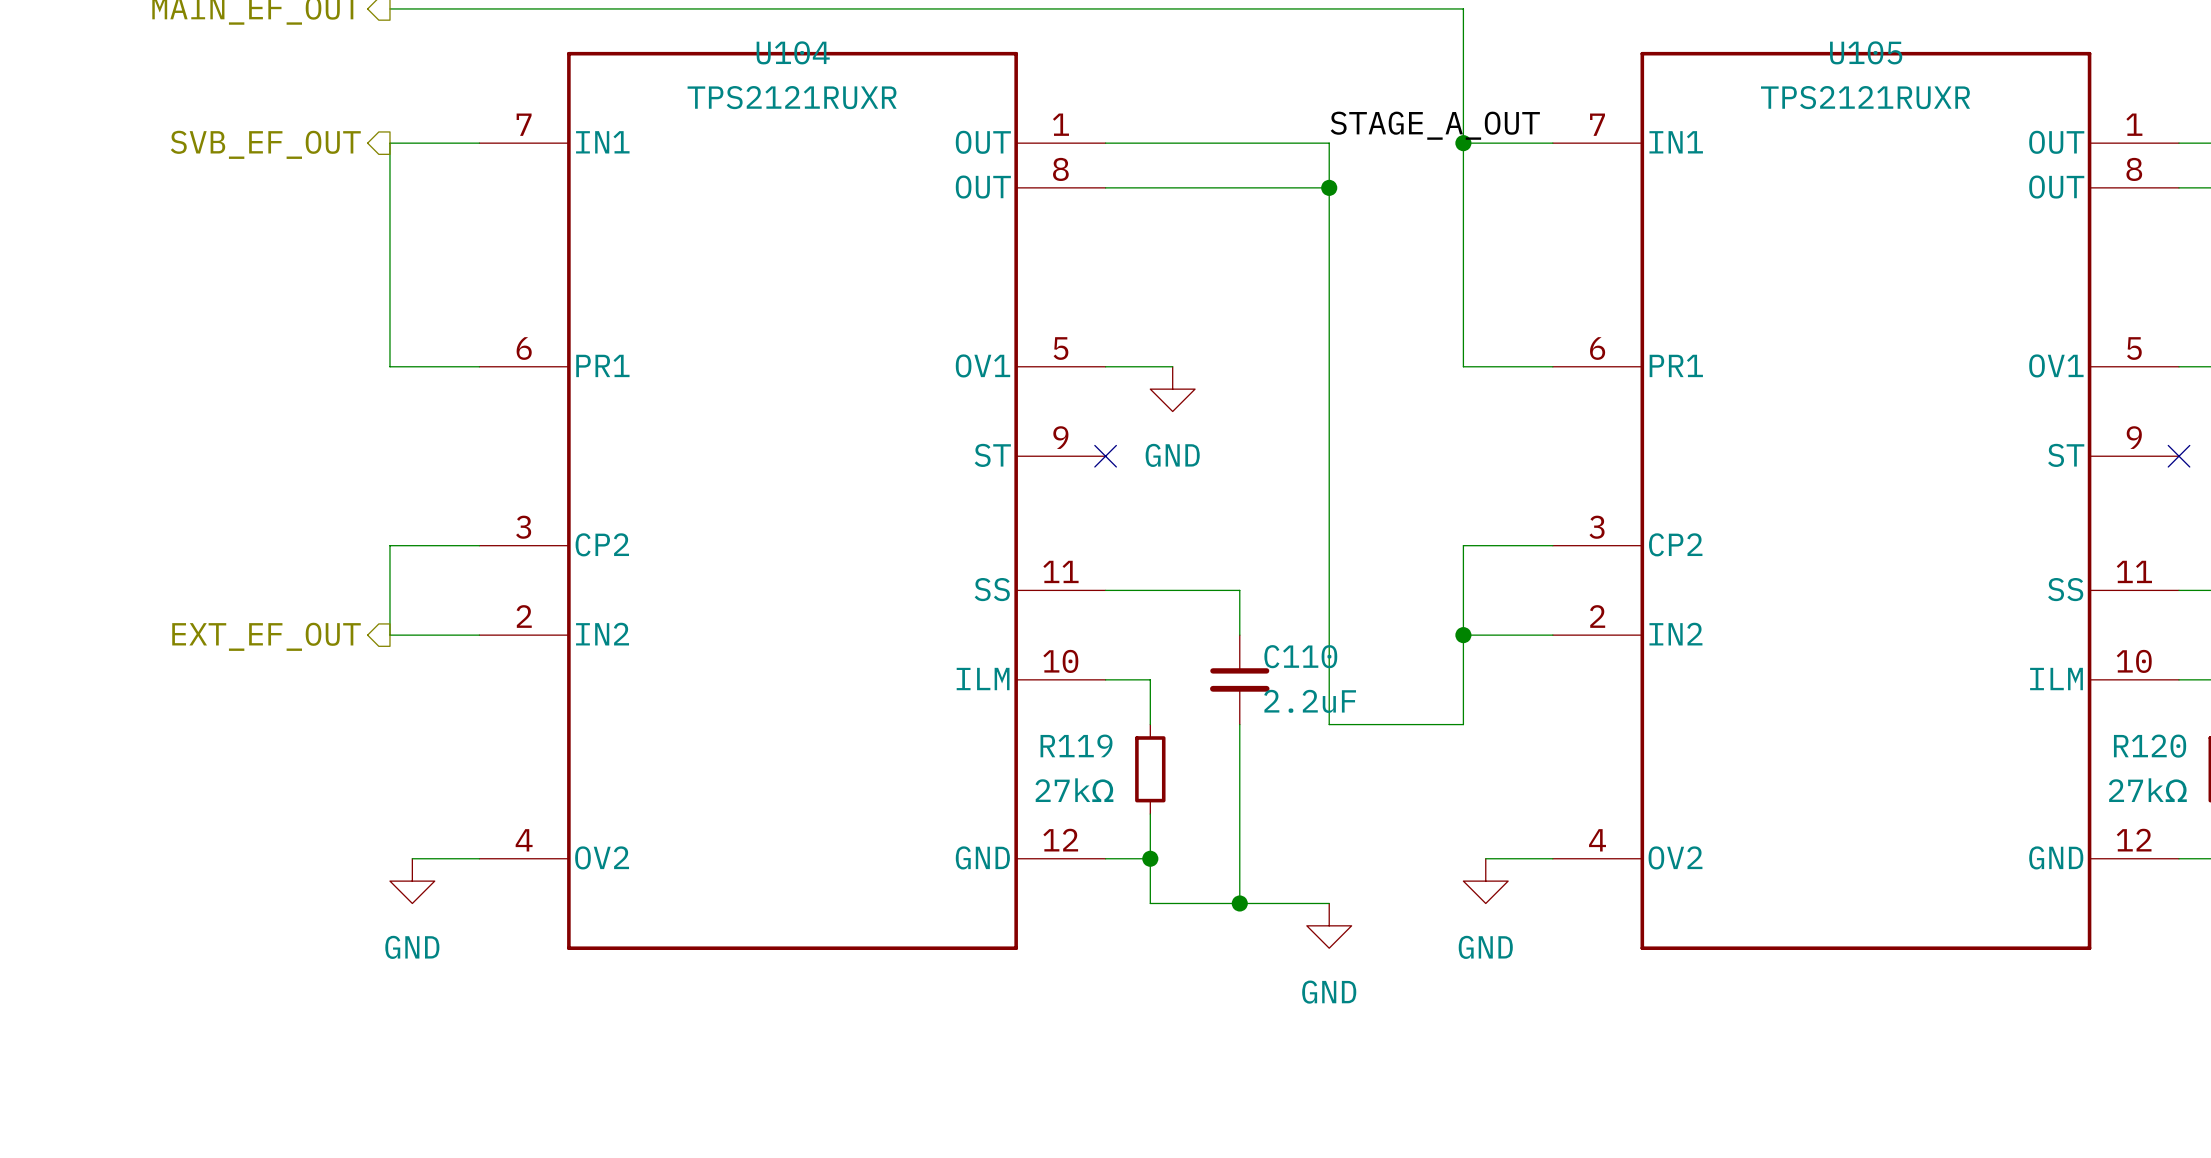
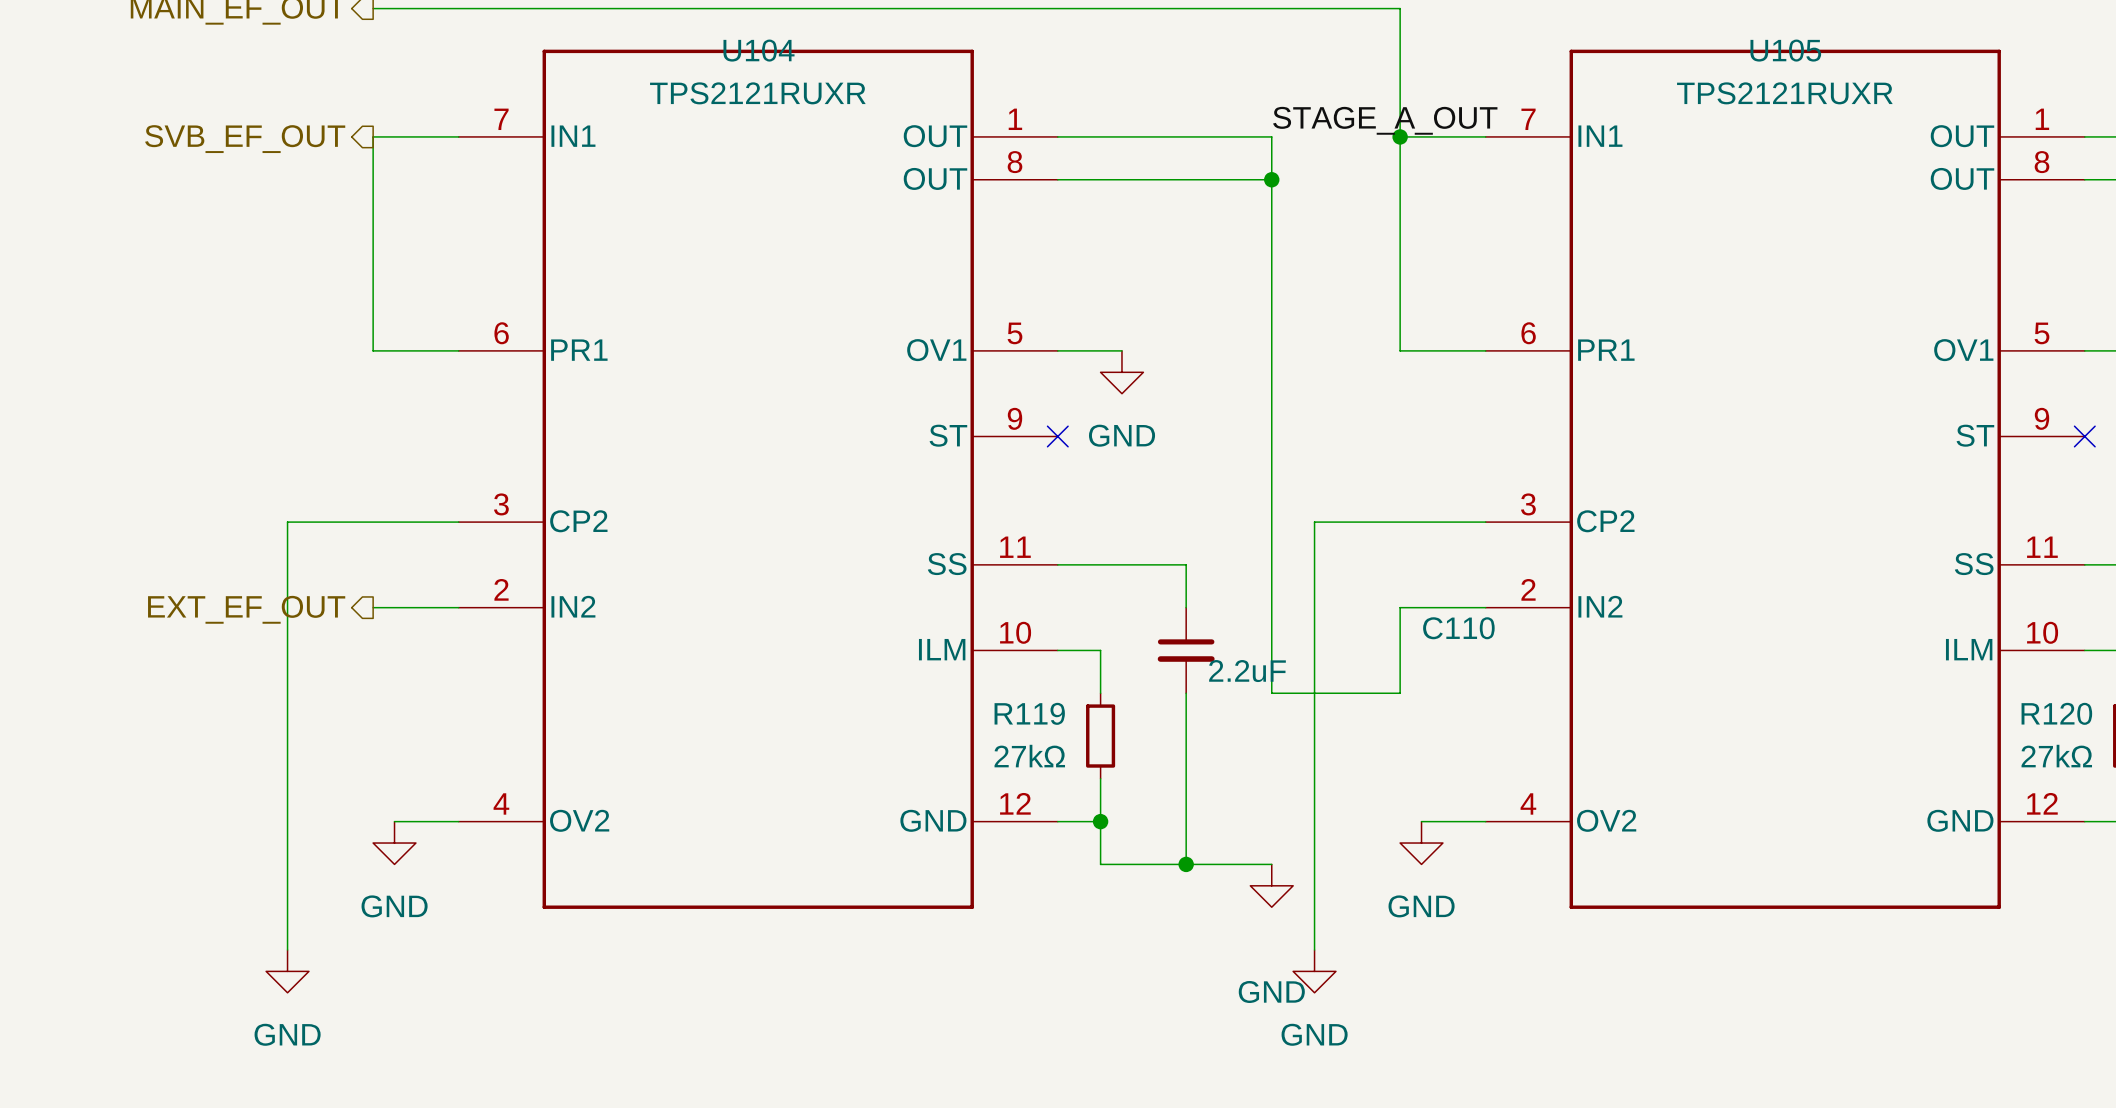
wire: (389, 545) (389, 635) -> (373, 522) (287, 522) (287, 950)
wire: (1463, 545) (1463, 635) -> (1400, 522) (1314, 522) (1314, 950)
junction: (1463, 635) -> none
C110 name position: C110 (1300, 656) -> C110 (1458, 628)
power symbol text position: GND (1329, 992) -> GND (1271, 991)
power symbol: none -> GND (287, 971)
power symbol: none -> GND (1314, 971)

